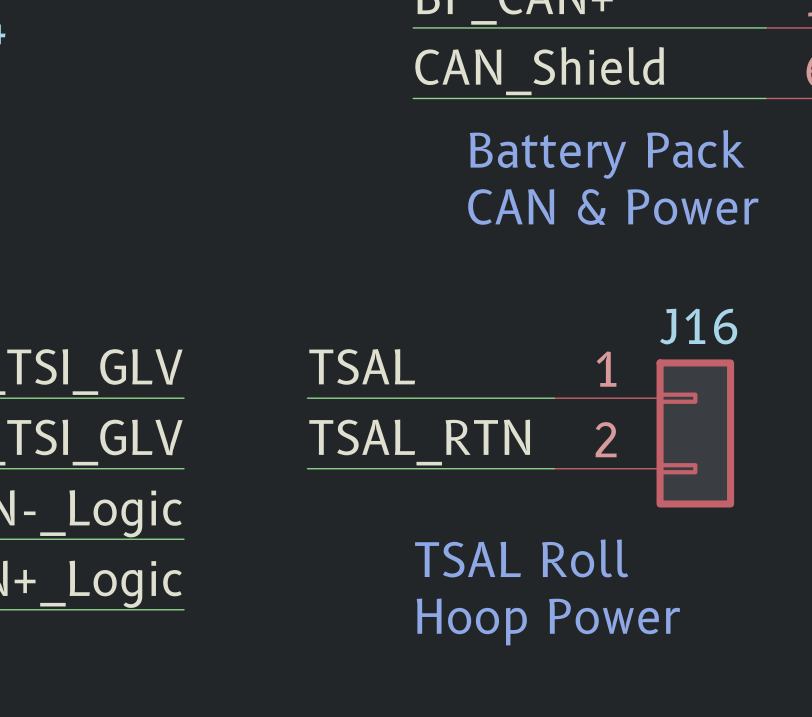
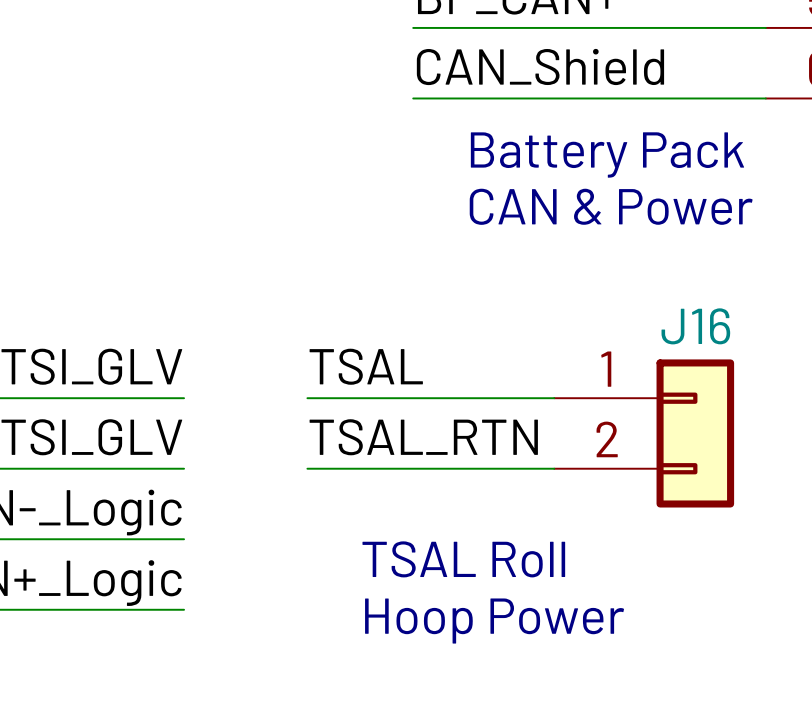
text position: TSAL Roll (521, 558) -> TSAL Roll (463, 559)
text position: Hoop Power (548, 621) -> Hoop Power (494, 621)

